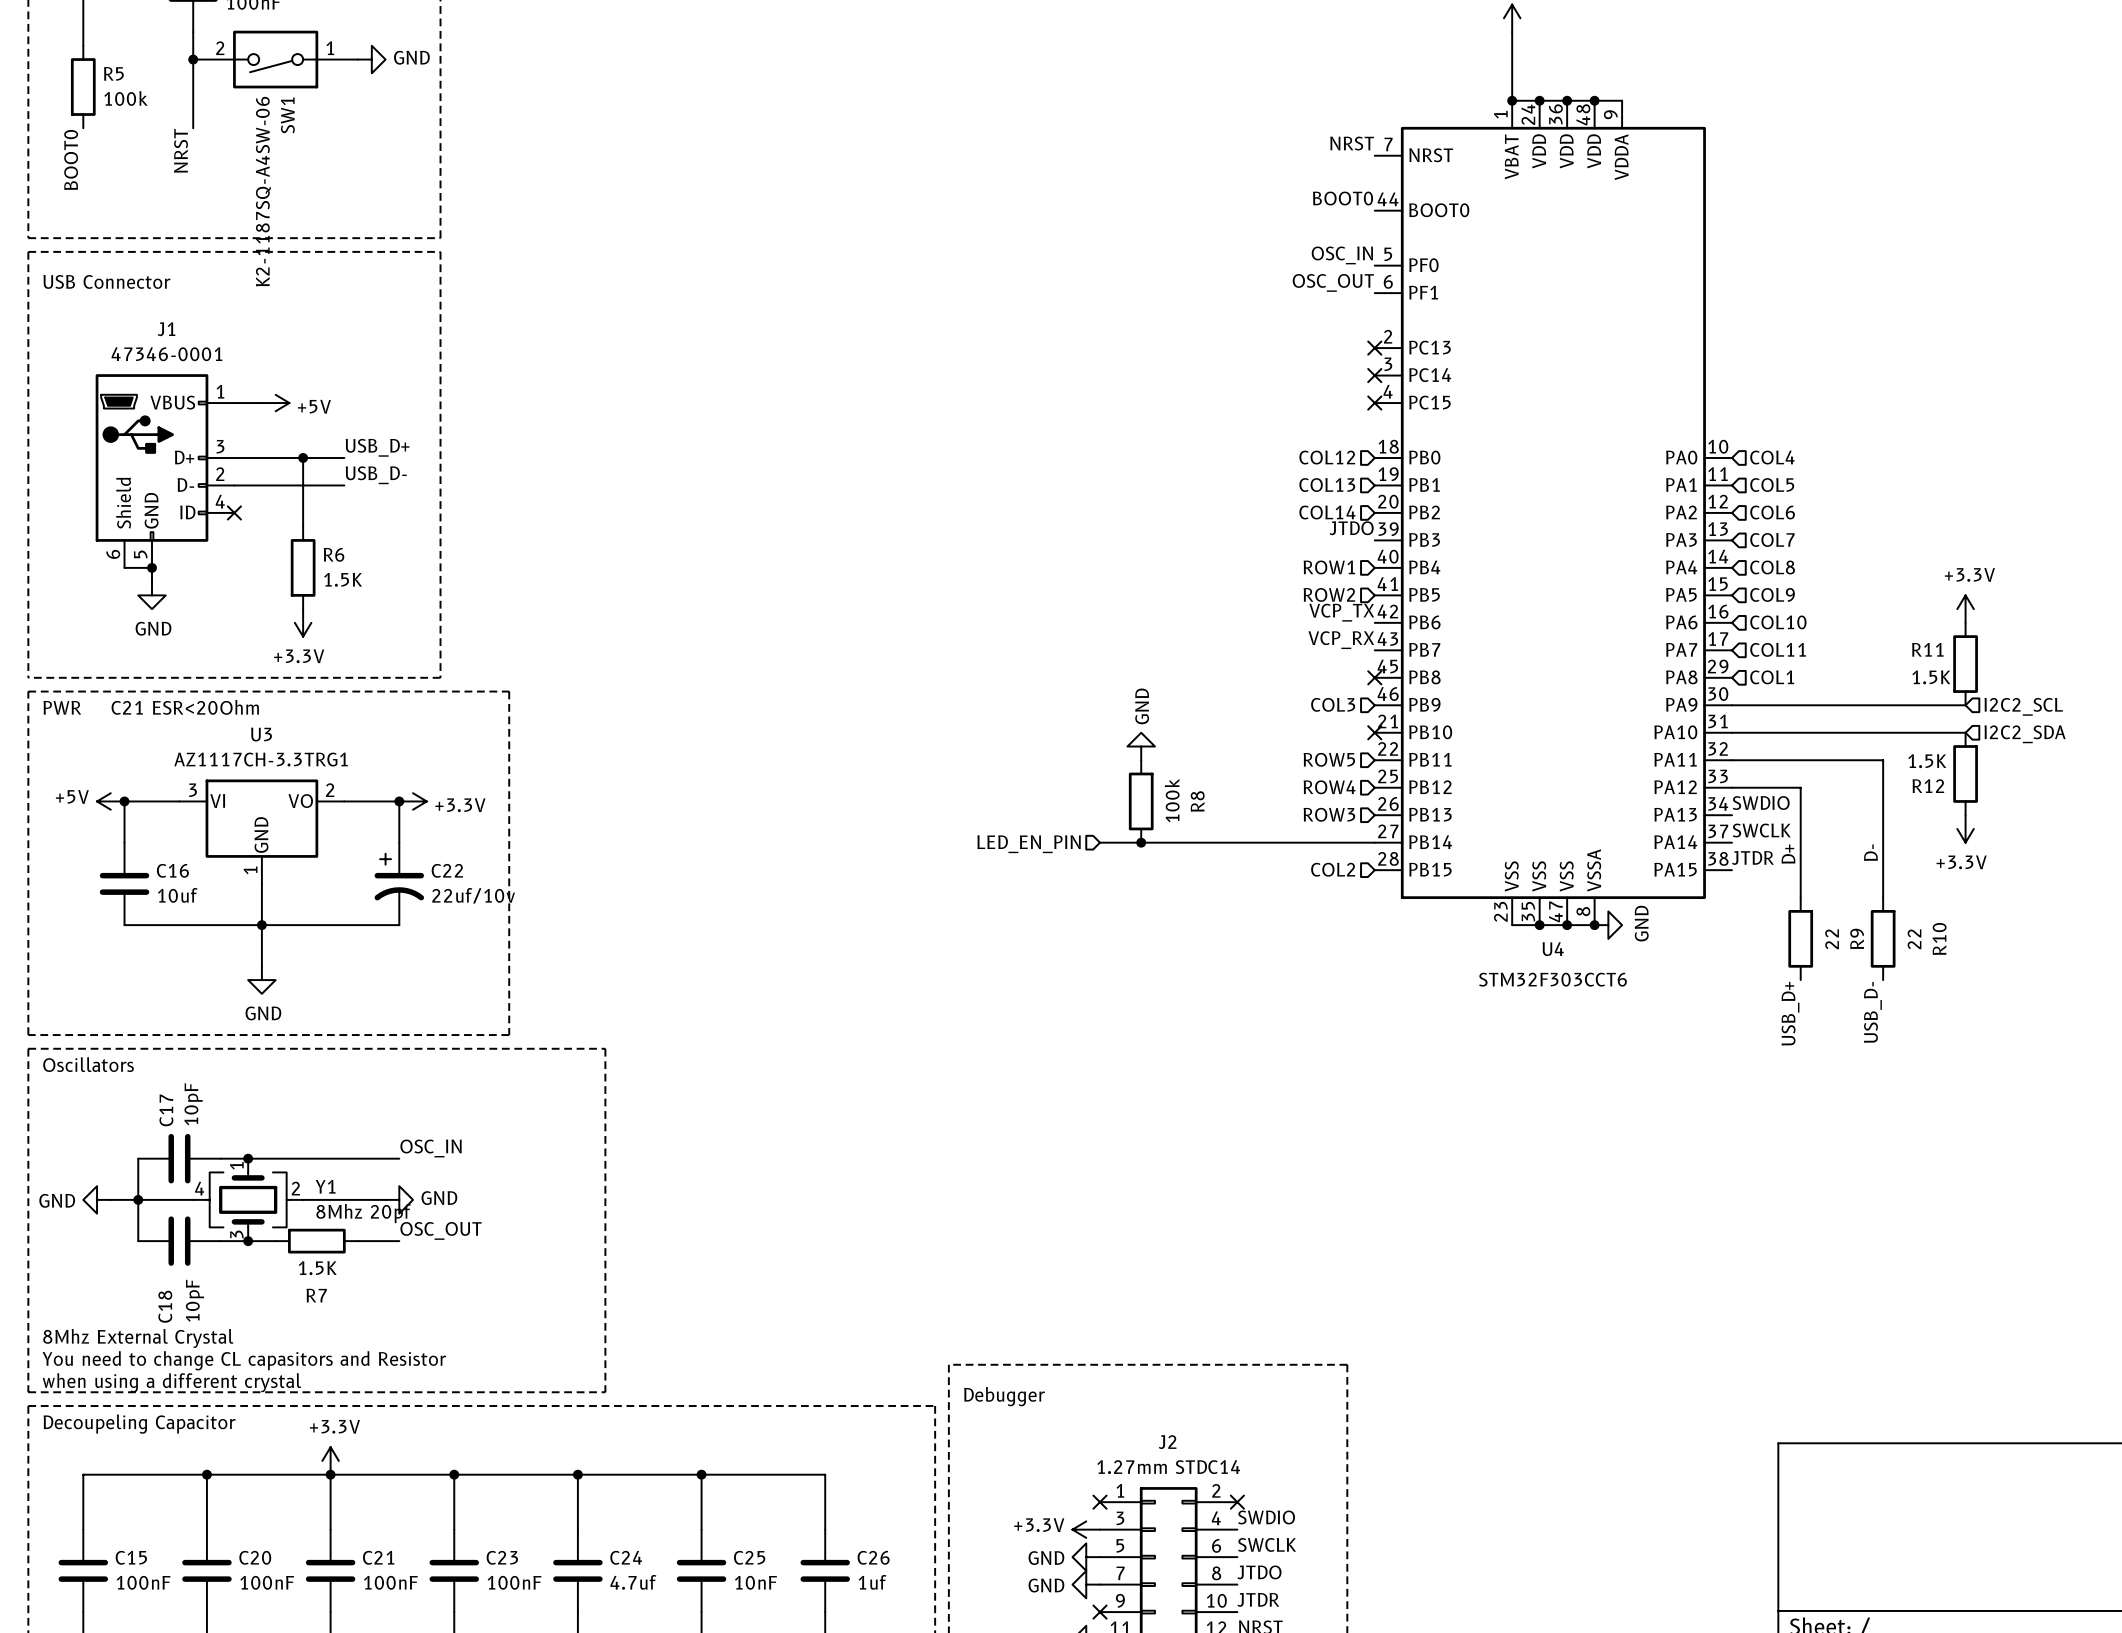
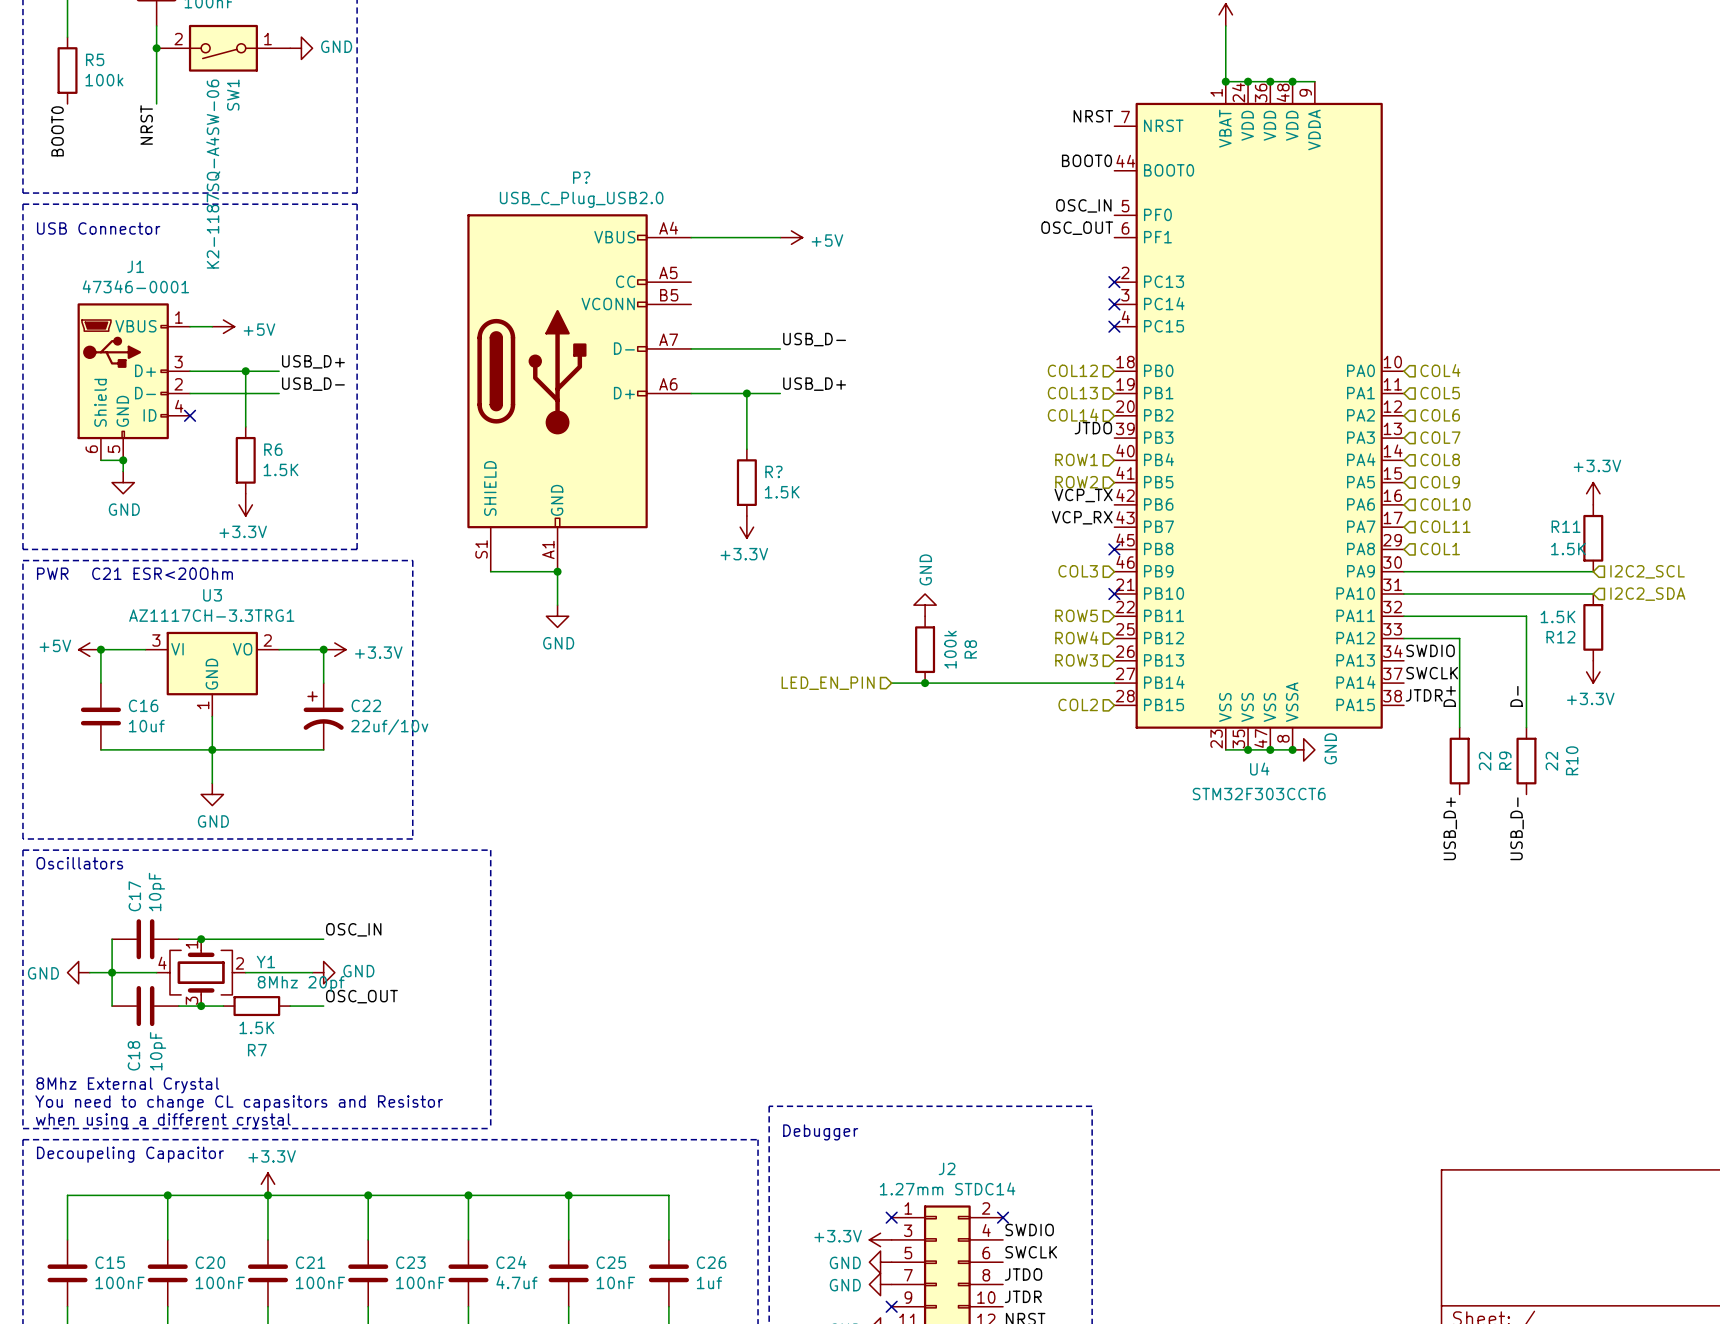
wire: none -> (691, 237) (780, 237)
power symbol: none -> +5V (791, 237)
label: none -> USB_D- (814, 339)
wire: none -> (691, 348) (780, 348)
label: none -> USB_D+ (814, 384)
P?: none -> USB_C_Plug_USB2.0 (579, 392)
wire: none -> (691, 393) (780, 393)
wire: none -> (746, 393) (746, 449)
junction: none -> (746, 393)
R?: none -> 1.5K (746, 482)
power symbol: none -> +3.3V (746, 527)
wire: none -> (490, 571) (557, 571) (557, 605)
junction: none -> (557, 571)
power symbol: none -> GND (557, 616)

